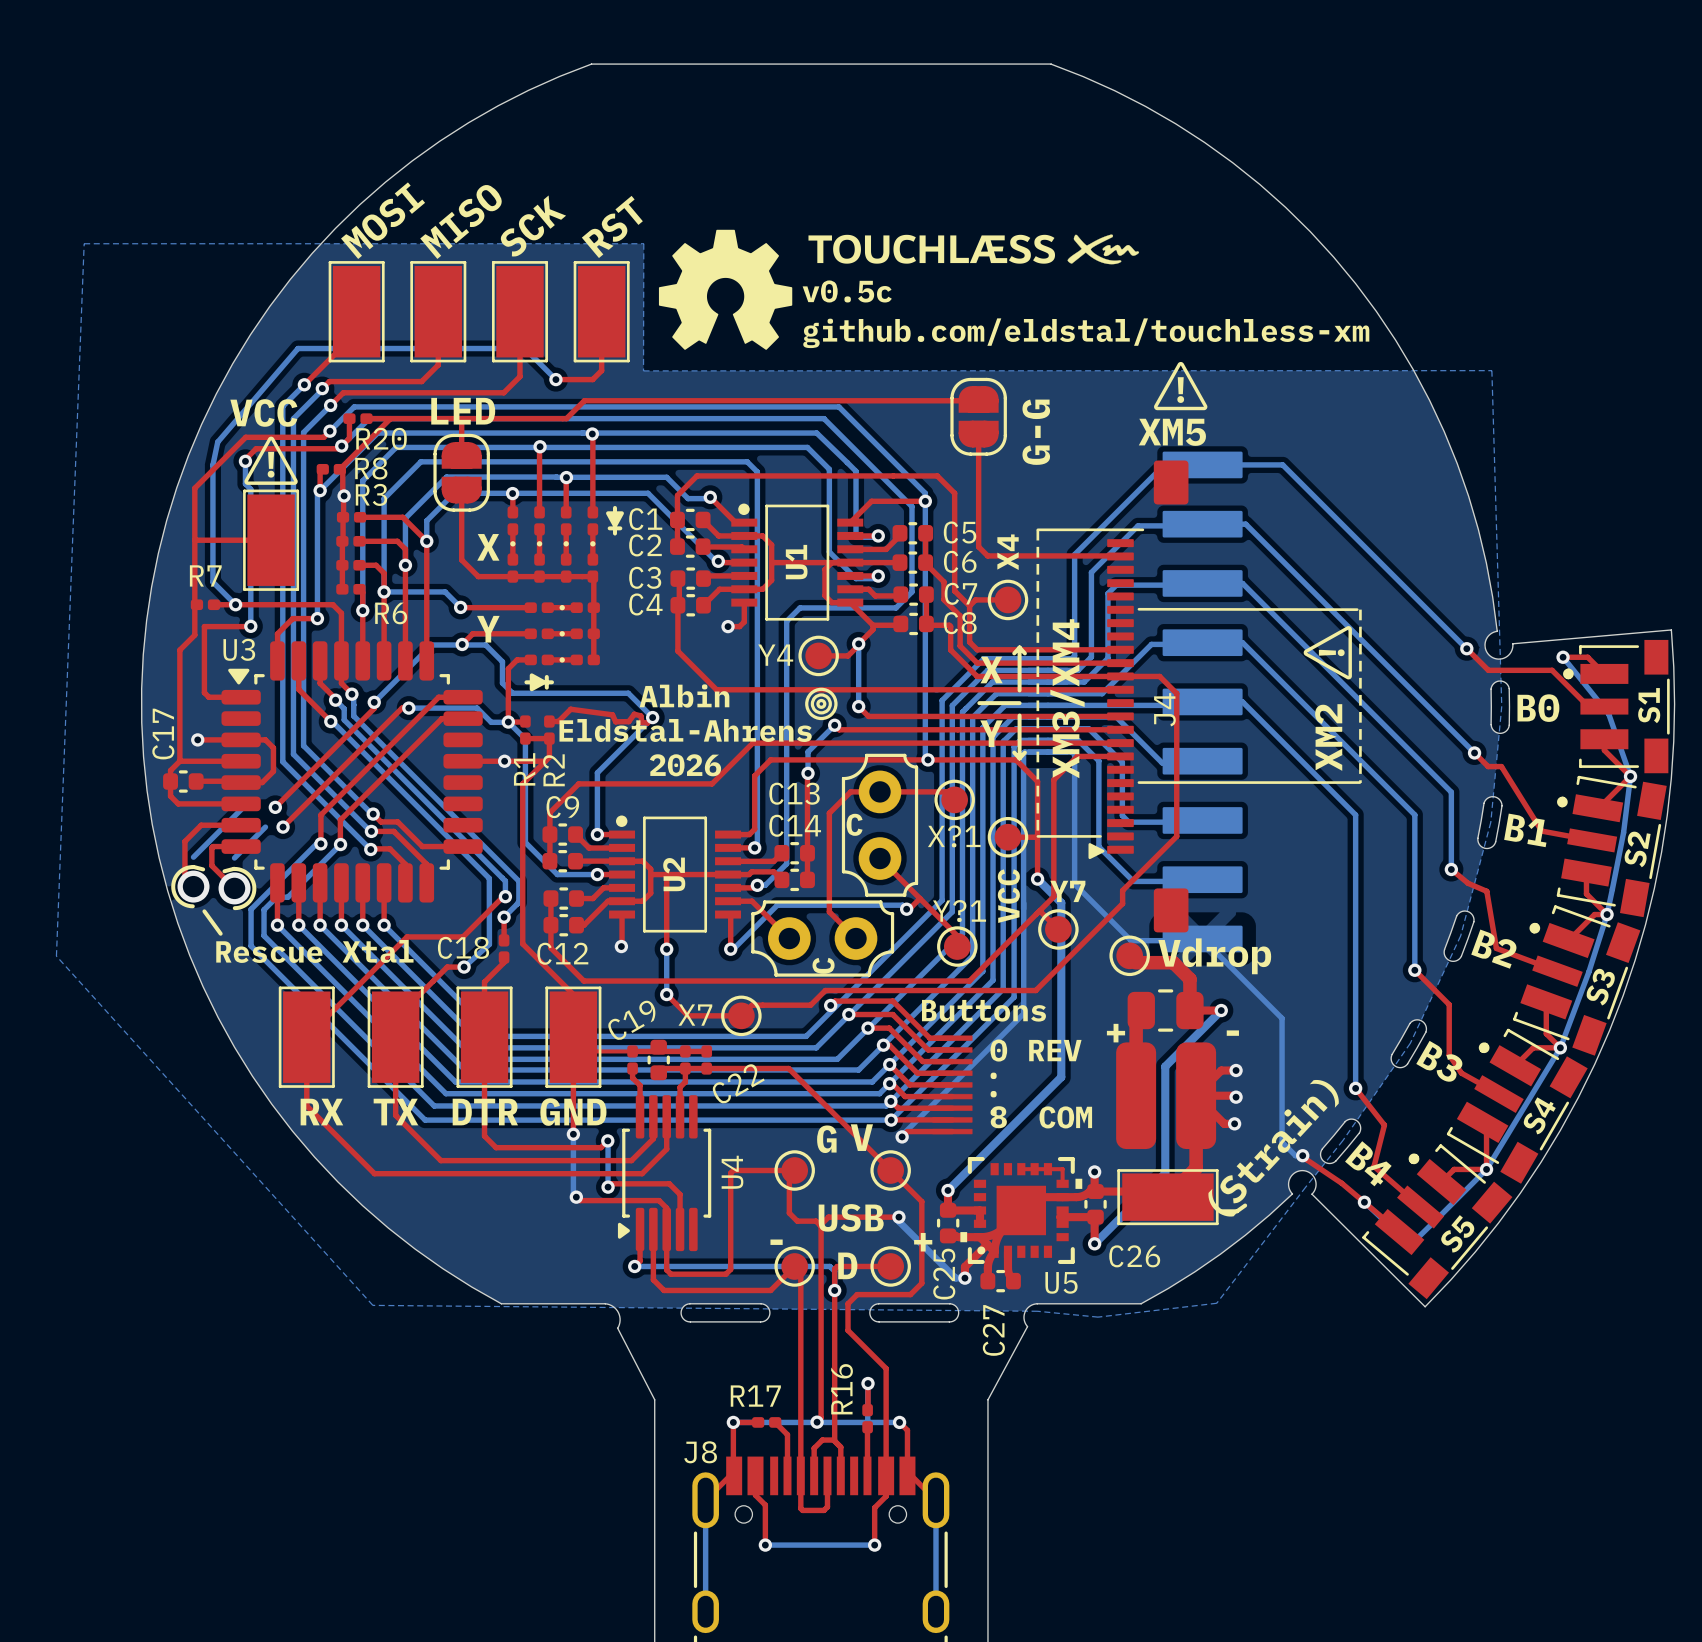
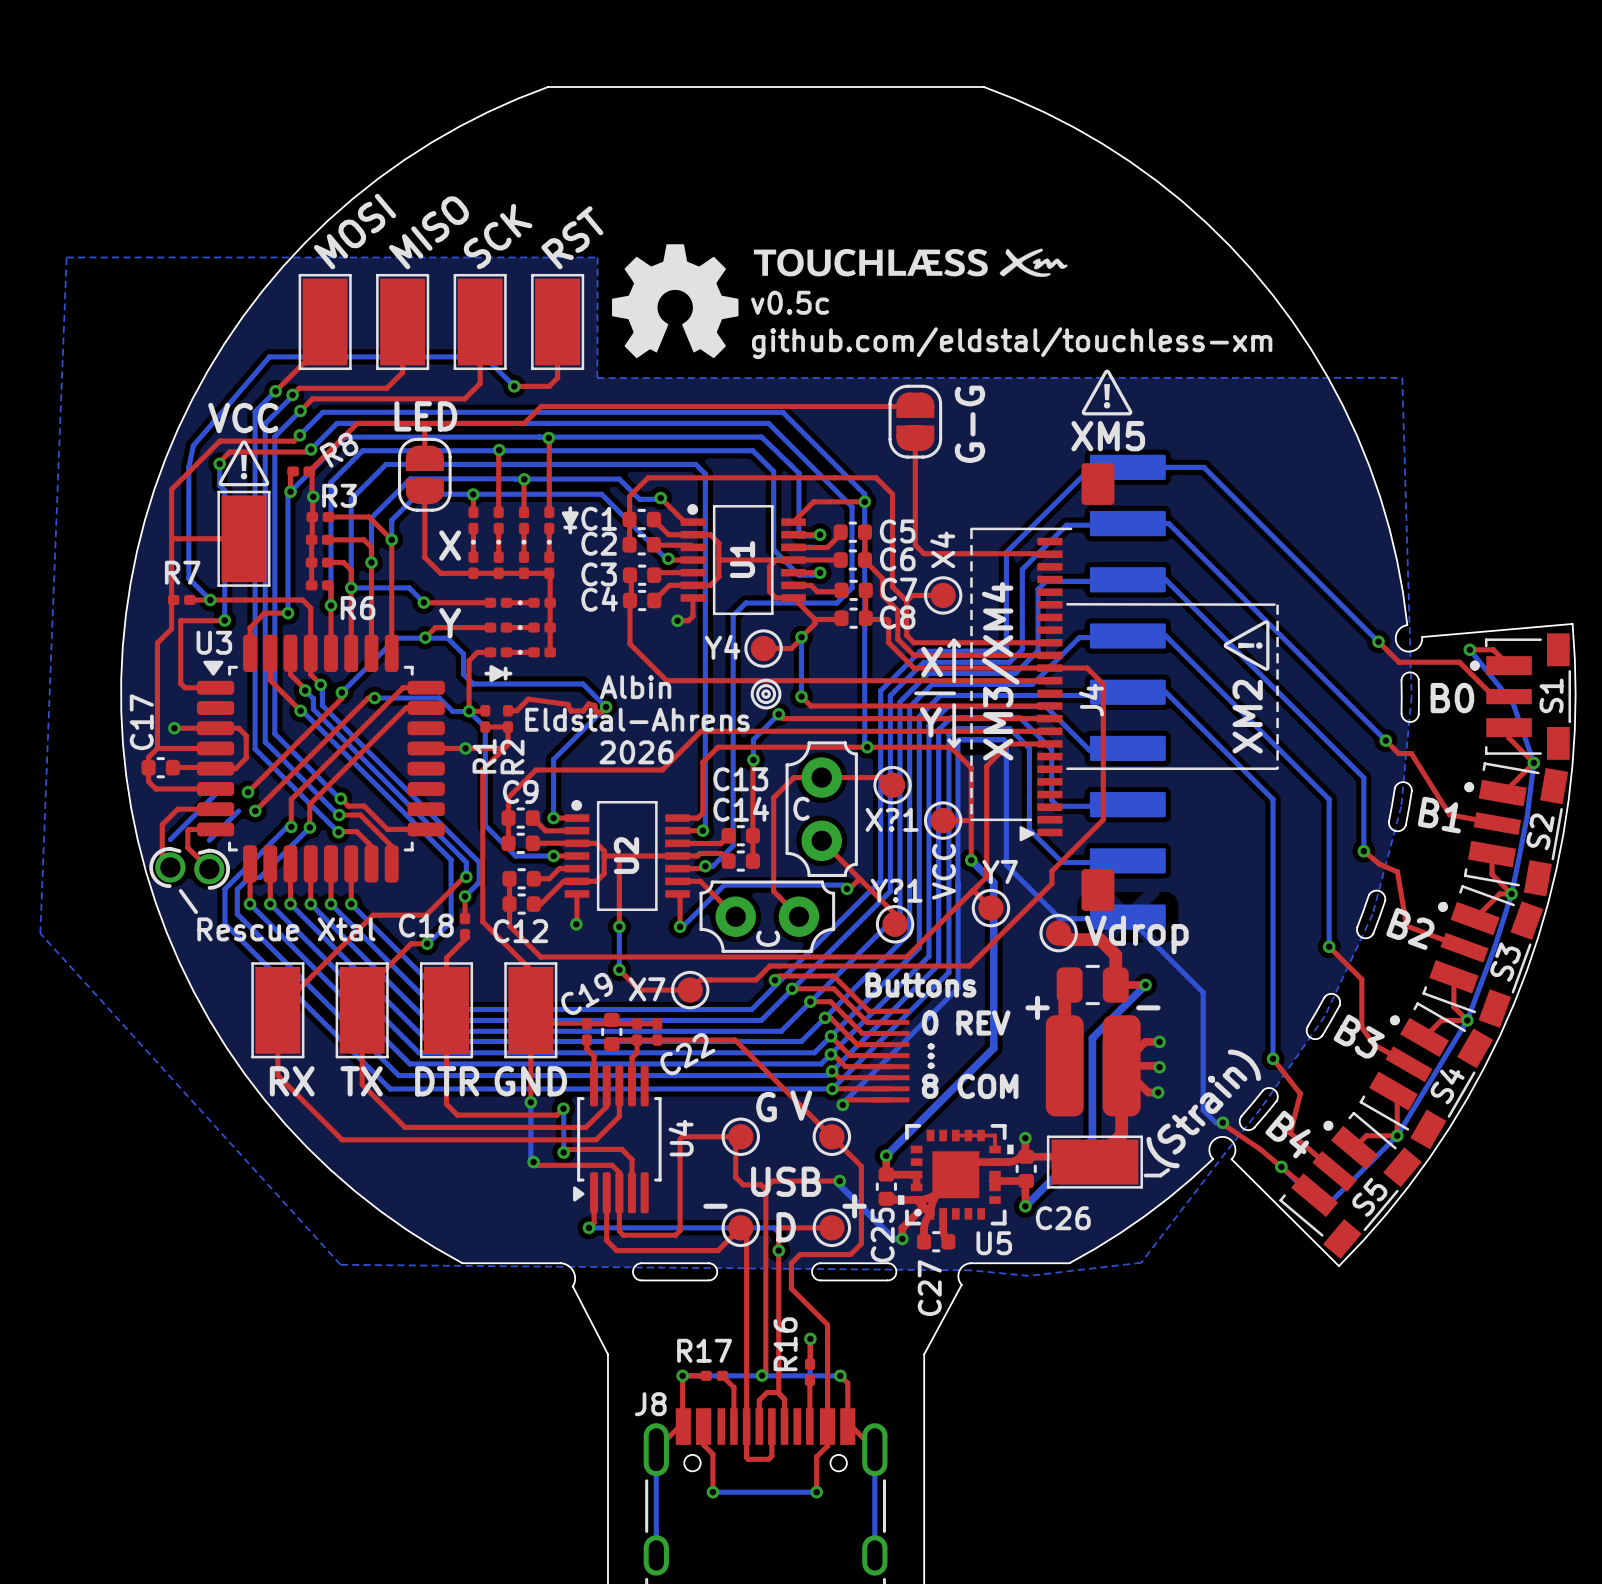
top track: (349, 418) (349, 438) (341, 446) -> none
R20: (357, 418) -> none
top track: (366, 418) (390, 418) -> none
R8 name rotation: 0° (371, 468) -> 30° counterclockwise (338, 450)

